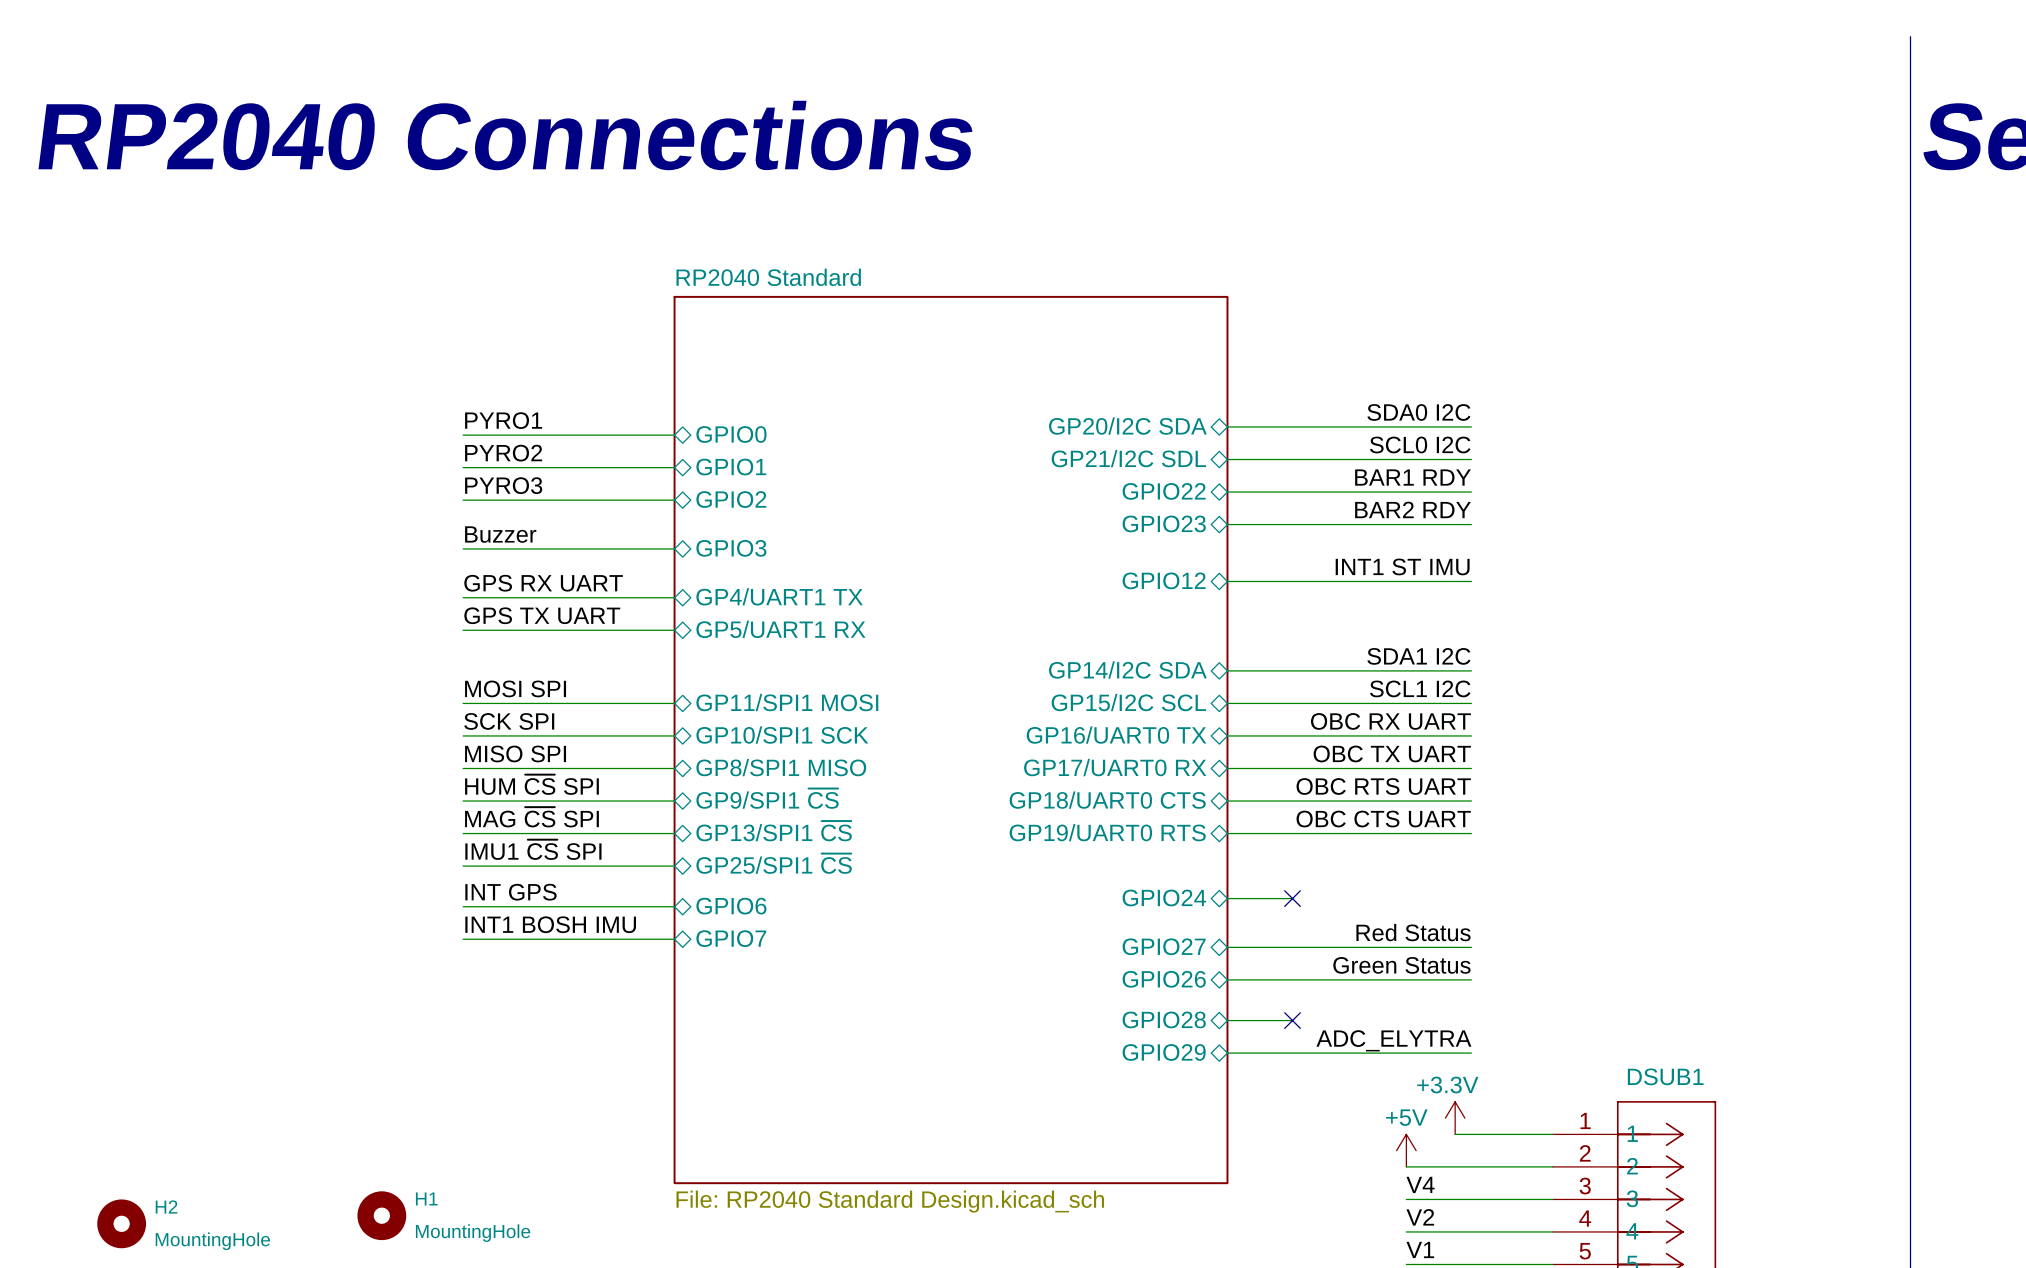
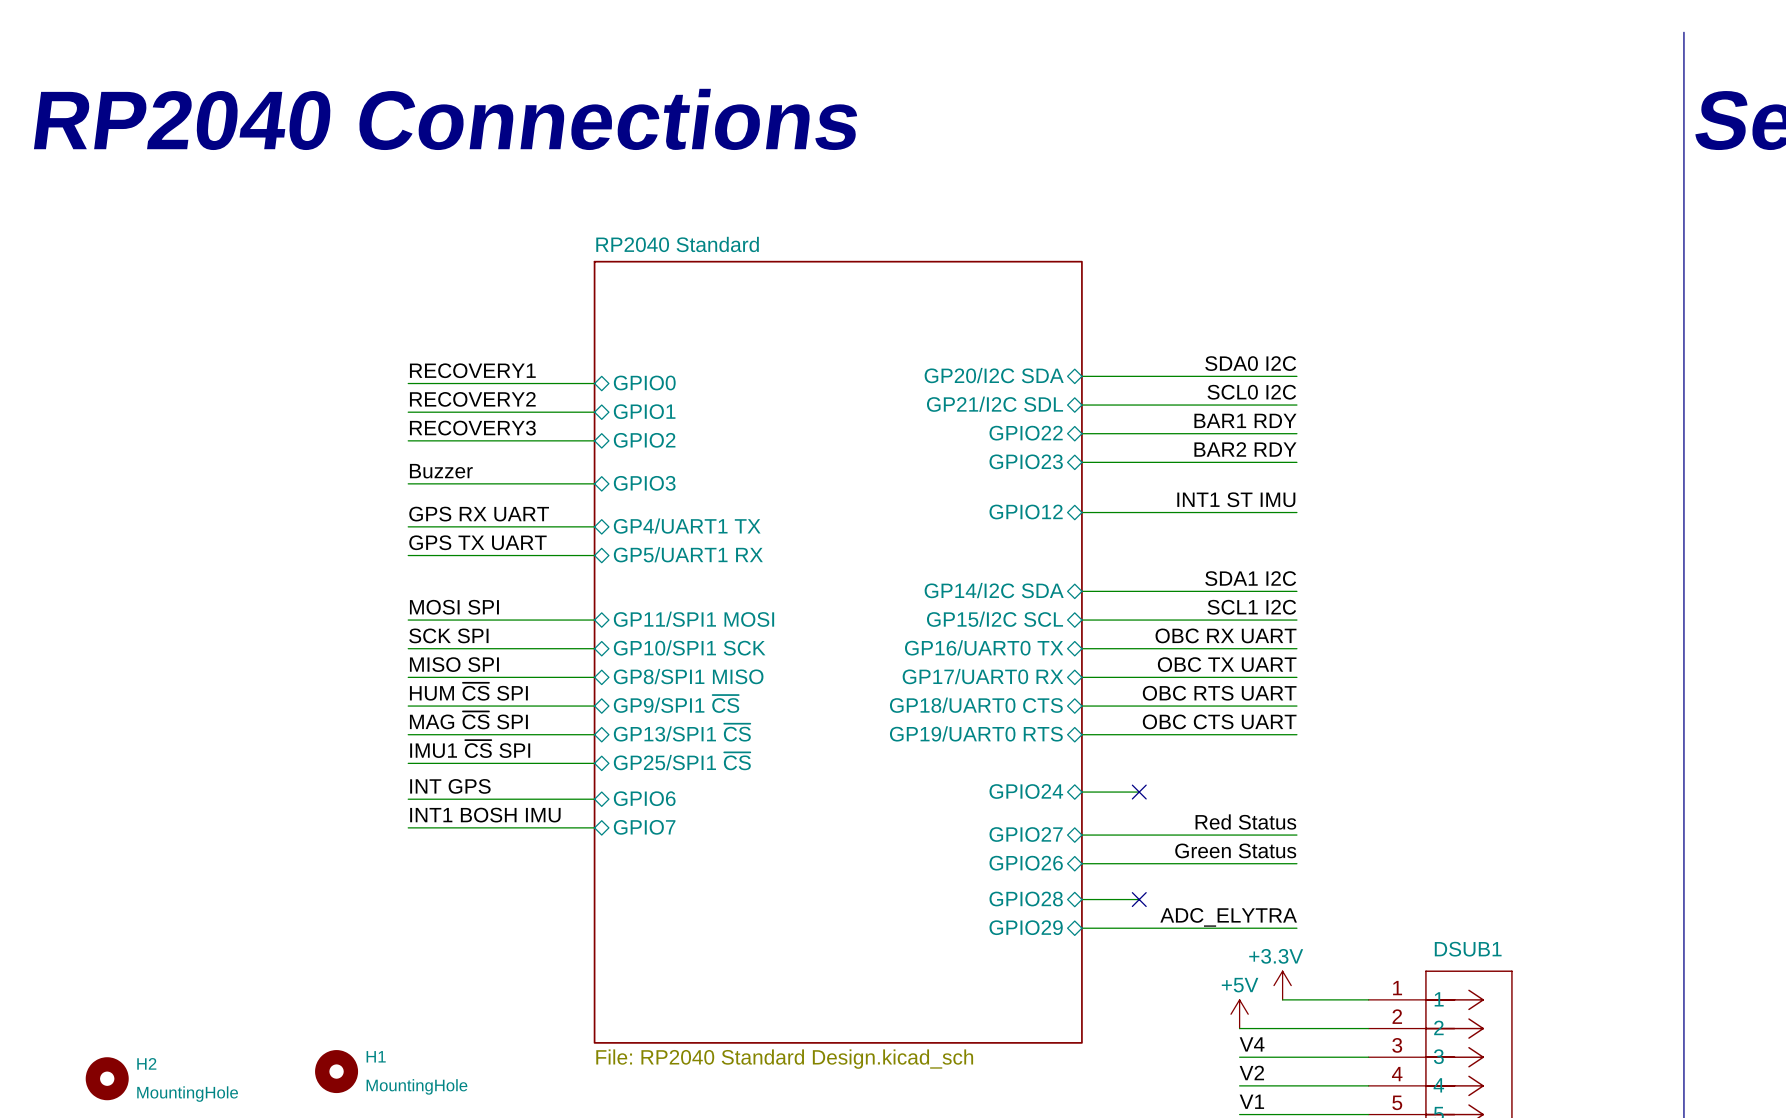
label: PYRO1 (503, 420) -> RECOVERY1 (472, 370)
label: PYRO2 (503, 453) -> RECOVERY2 (472, 399)
label: PYRO3 (503, 485) -> RECOVERY3 (472, 428)

